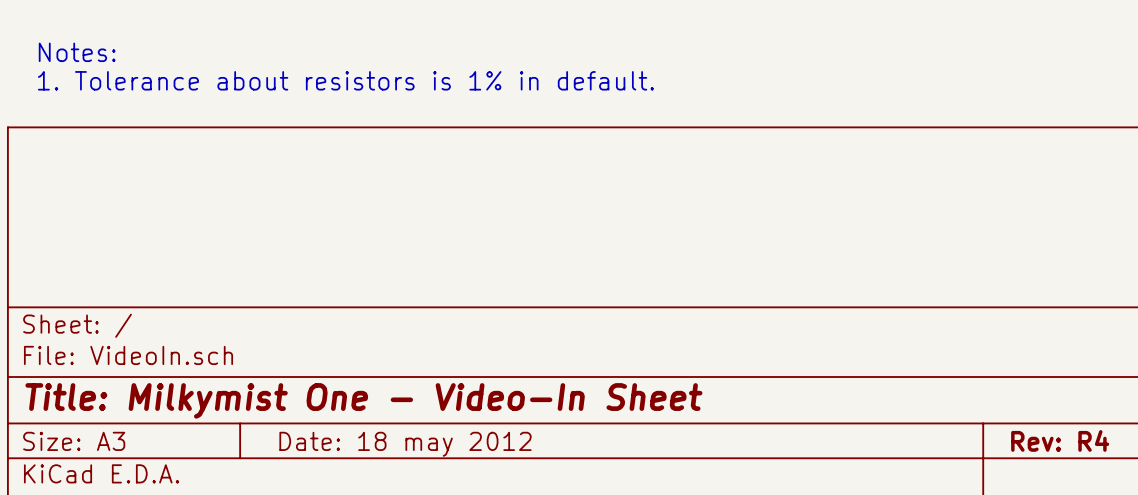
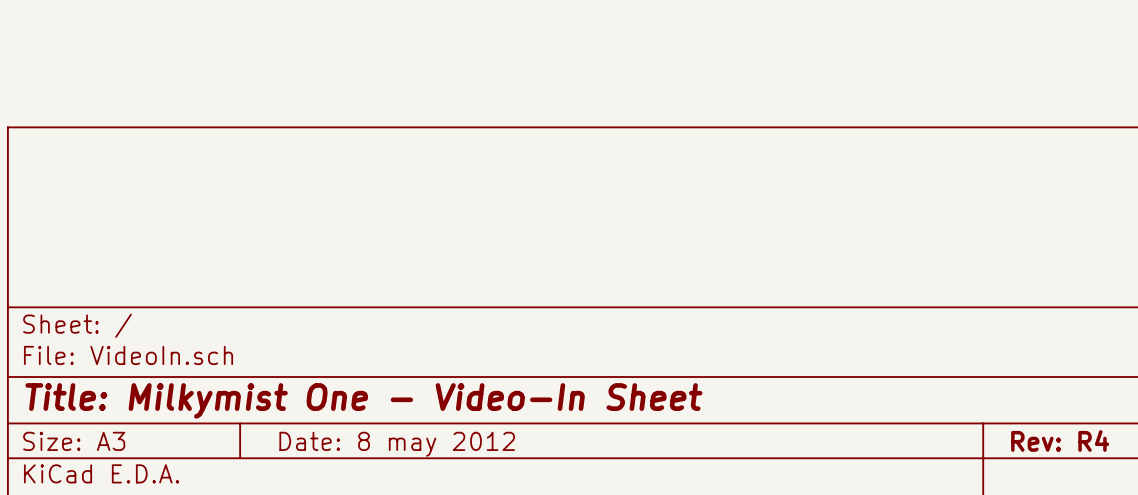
text: Notes: (77, 52) -> none
text: 1. Tolerance about resistors is 1% in default. (345, 80) -> none
title block: Date: 18 may 2012 (405, 444) -> Date: 8 may 2012 (397, 444)

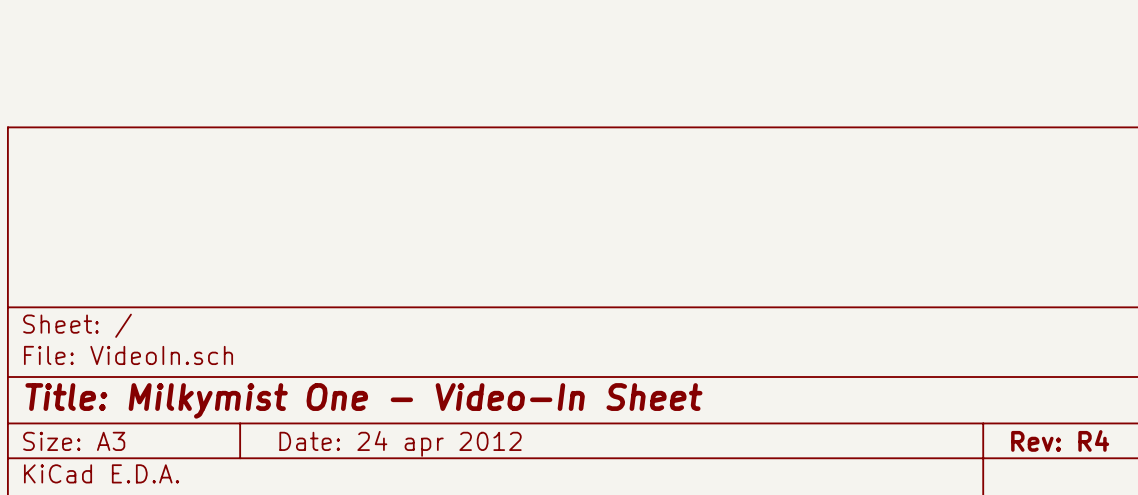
title block: Date: 8 may 2012 (397, 444) -> Date: 24 apr 2012 (400, 443)

